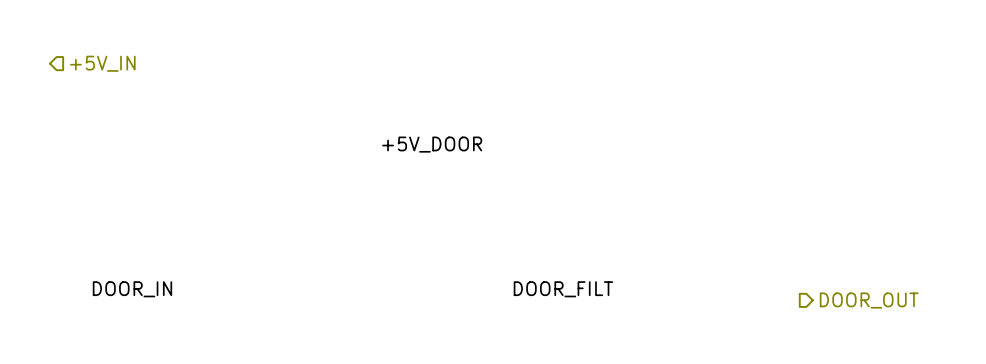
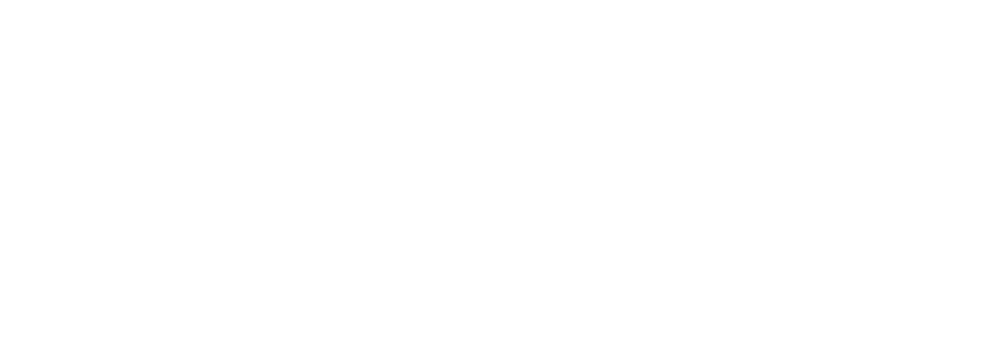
hierarchical label: +5V_IN (102, 63) -> none
label: +5V_DOOR (432, 144) -> none
label: DOOR_IN (132, 289) -> none
label: DOOR_FILT (563, 289) -> none
hierarchical label: DOOR_OUT (869, 300) -> none

